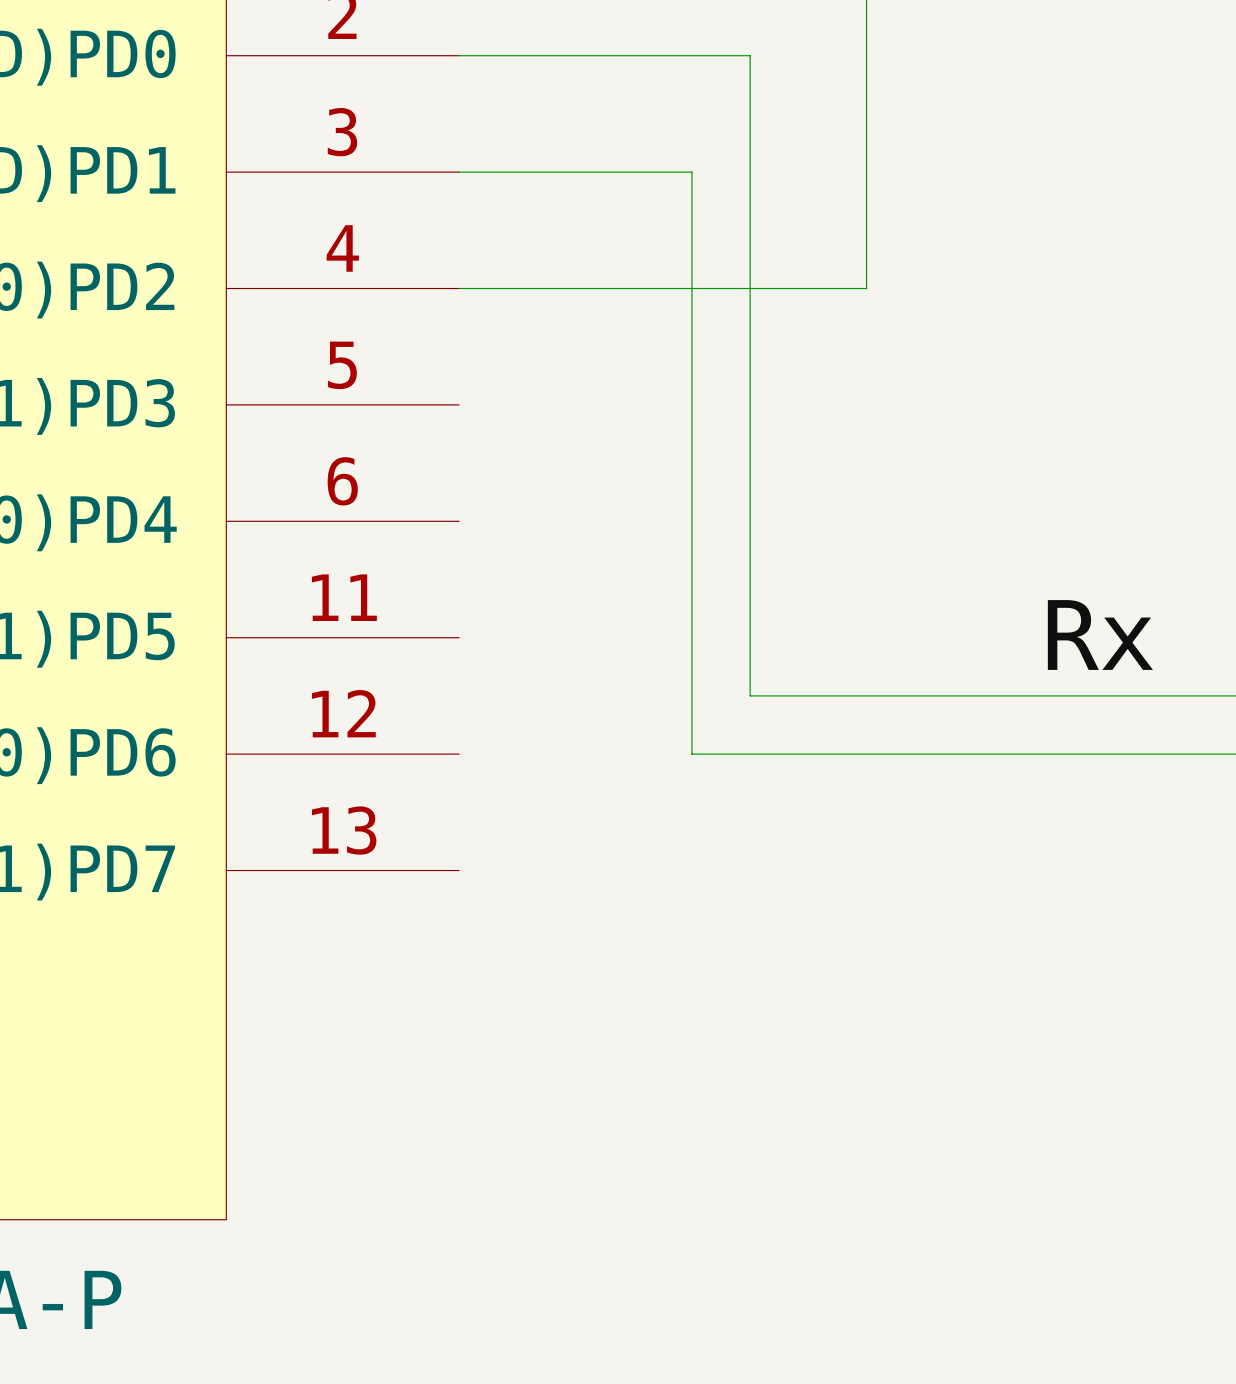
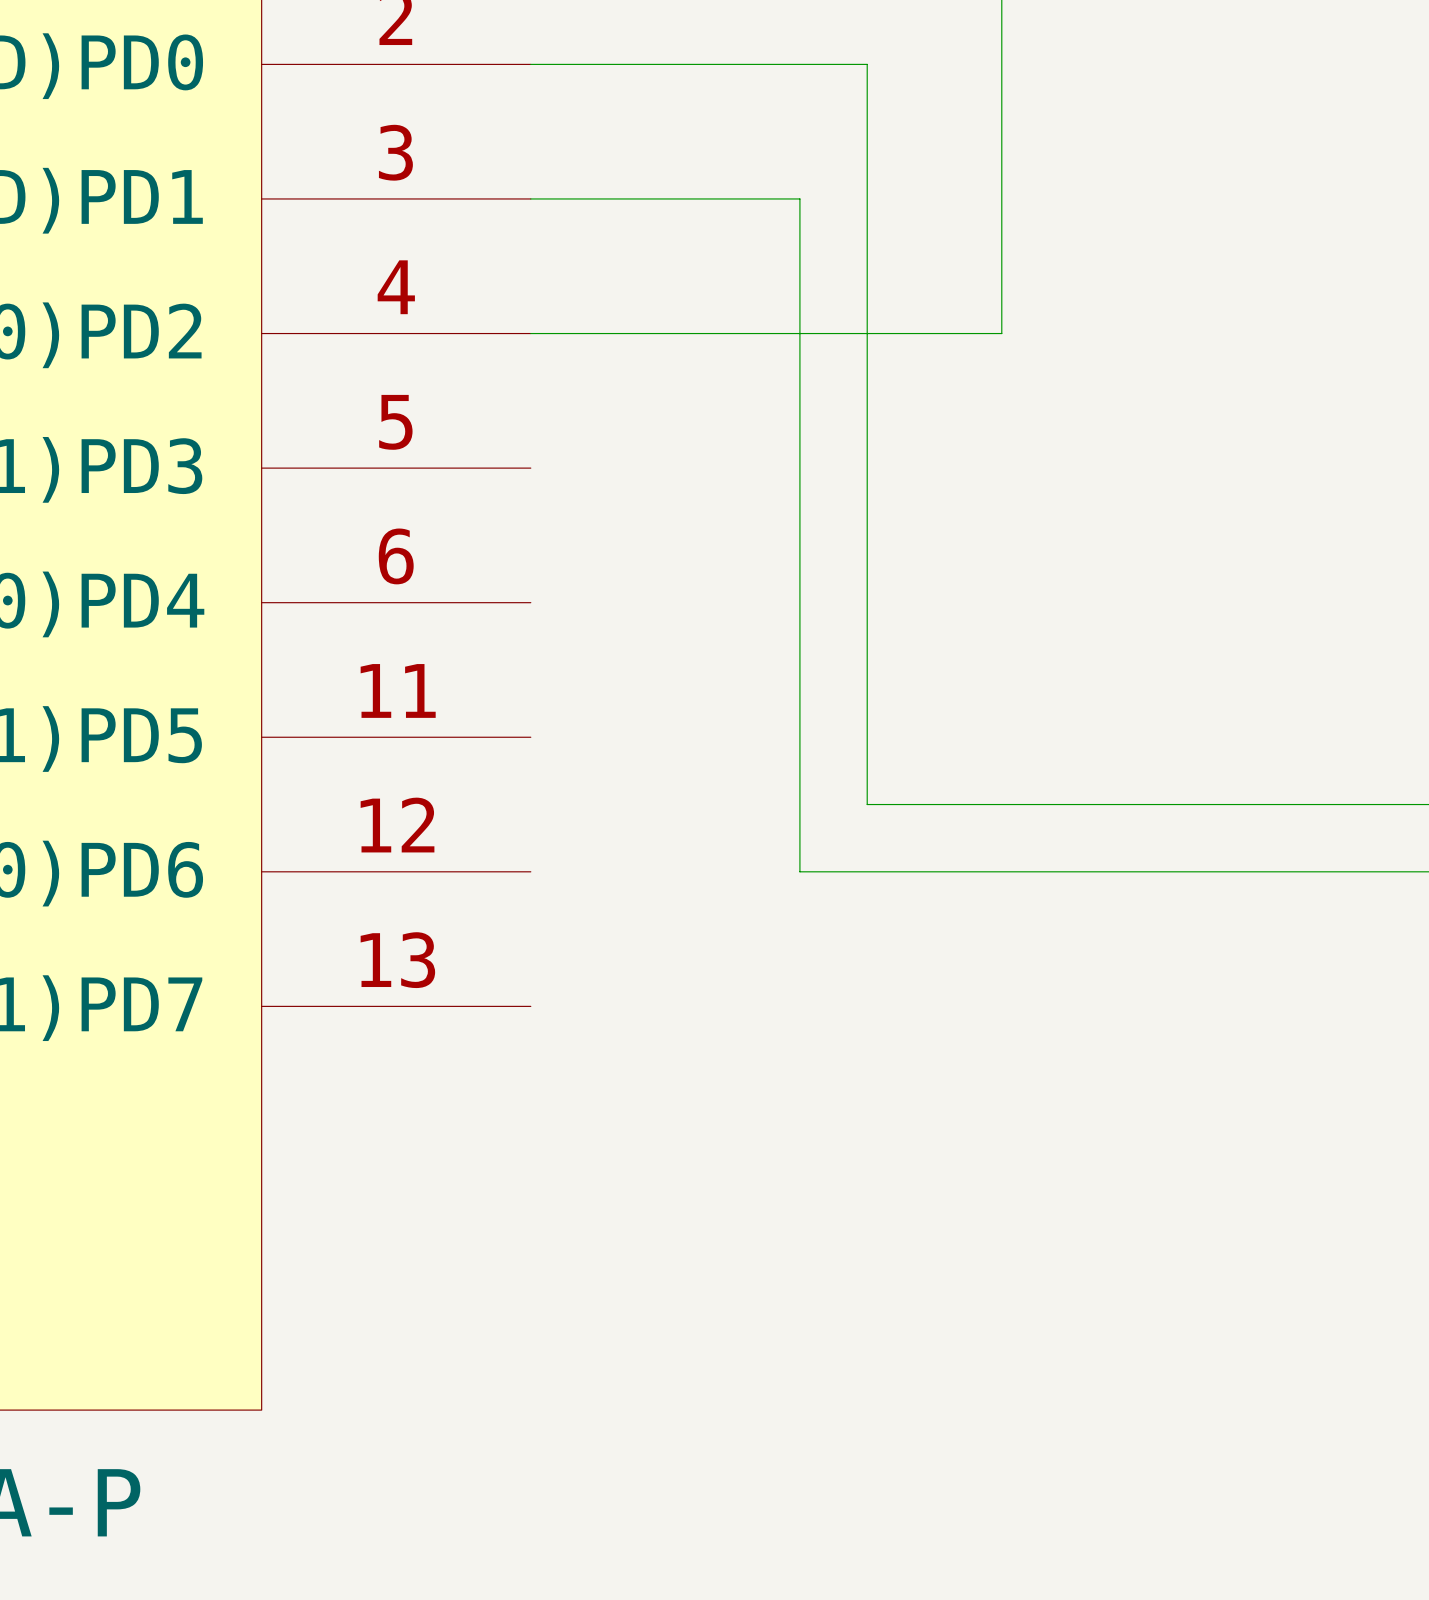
label: Rx (1100, 635) -> none

